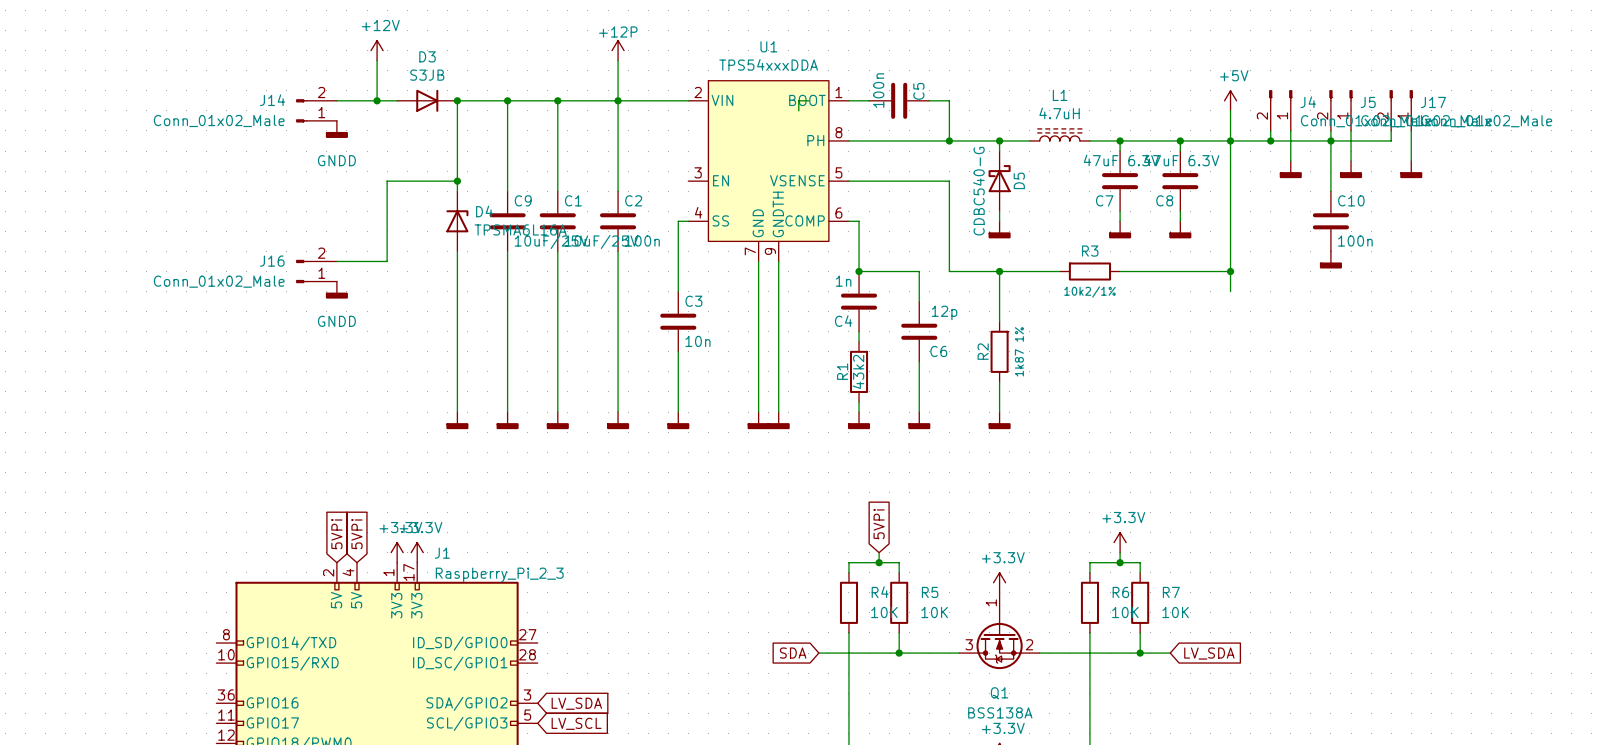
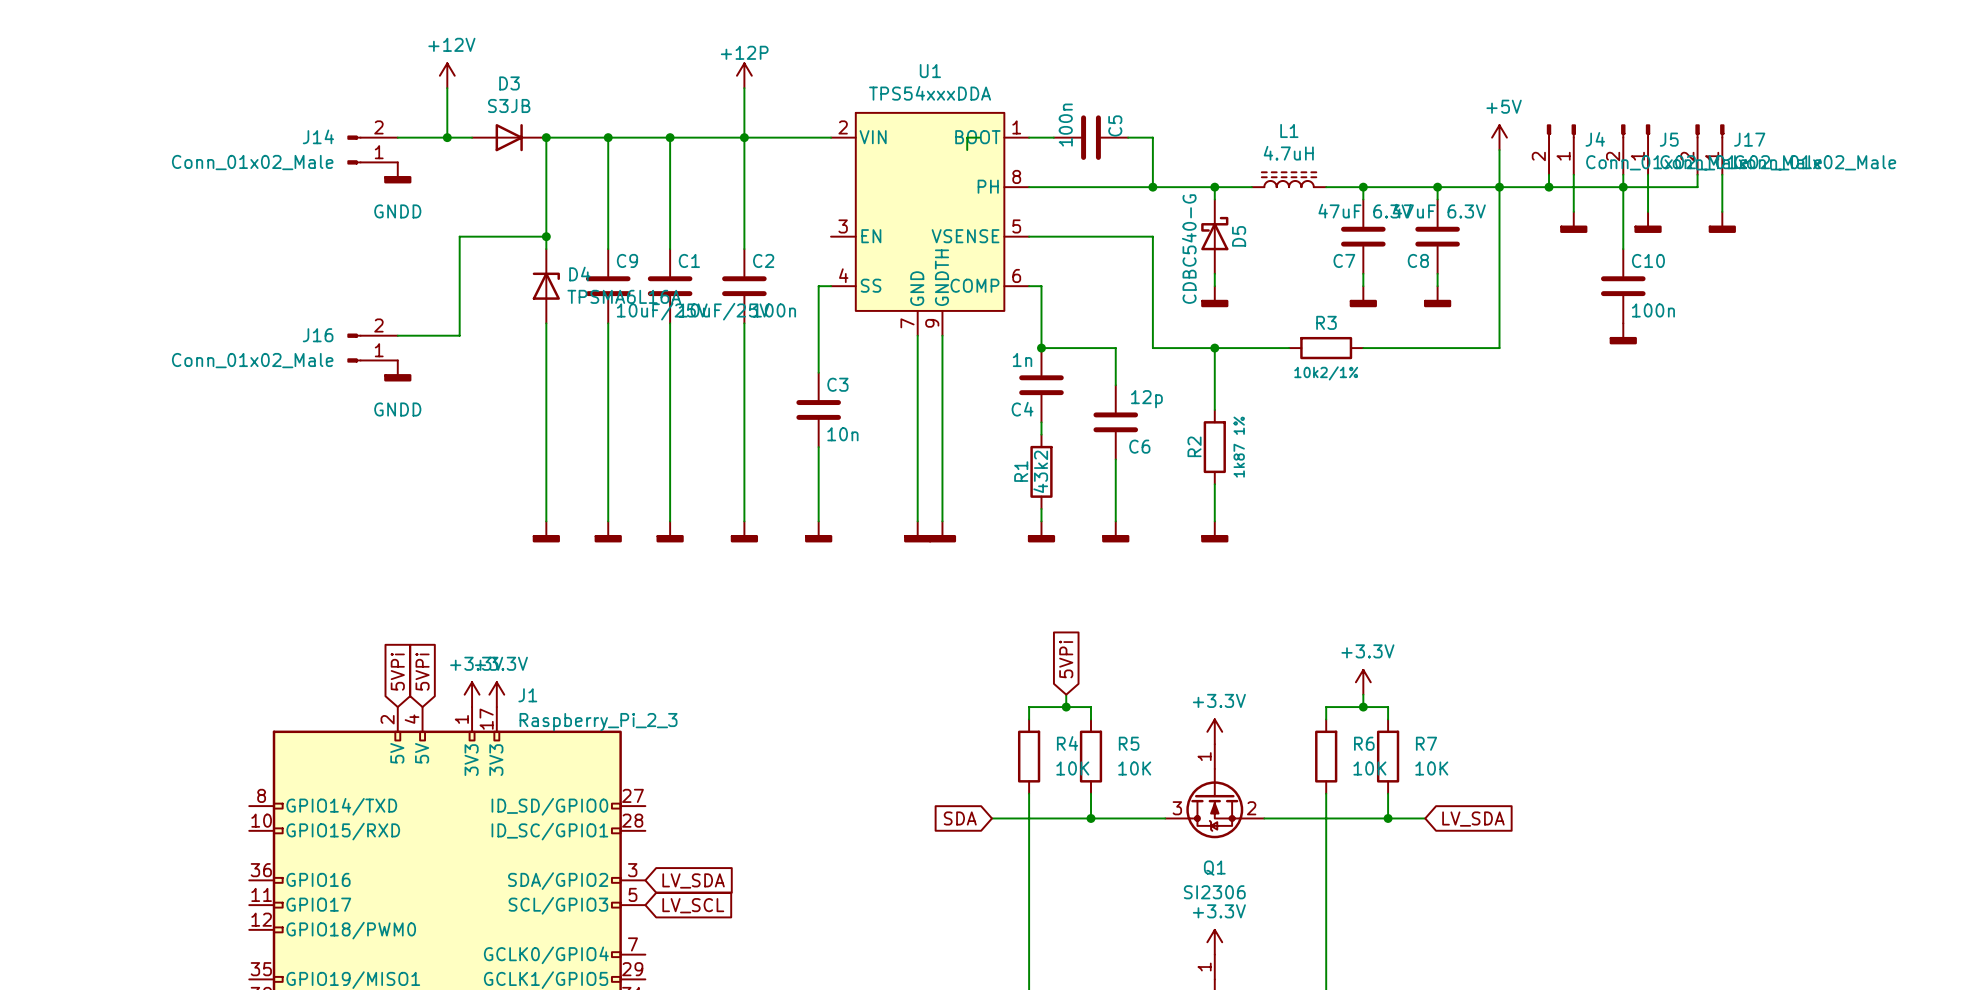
wire: (1230, 271) (1230, 291) -> none
junction: (1230, 271) -> none
Q1 value: BSS138A (1000, 712) -> SI2306 (1214, 892)

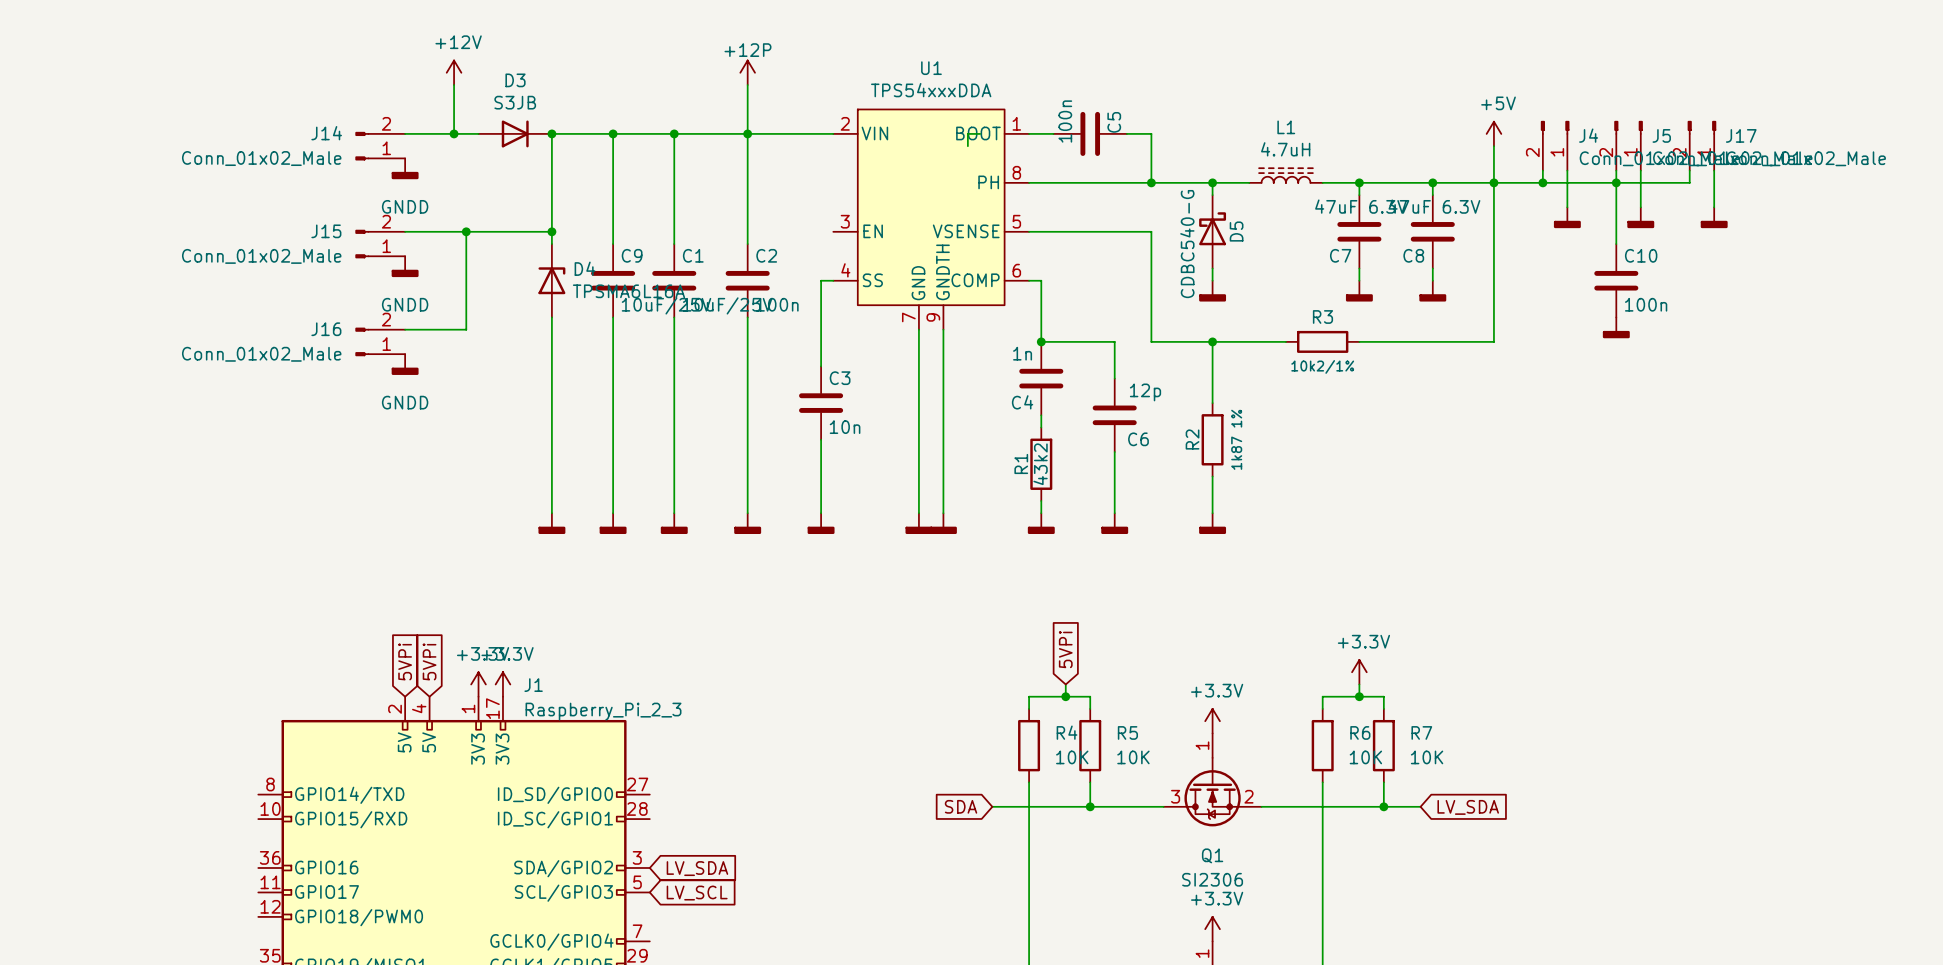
wire: none -> (405, 231) (466, 231)
junction: none -> (466, 231)
J15: none -> Conn_01x02_Male (380, 244)
power symbol: none -> GNDD (405, 266)

